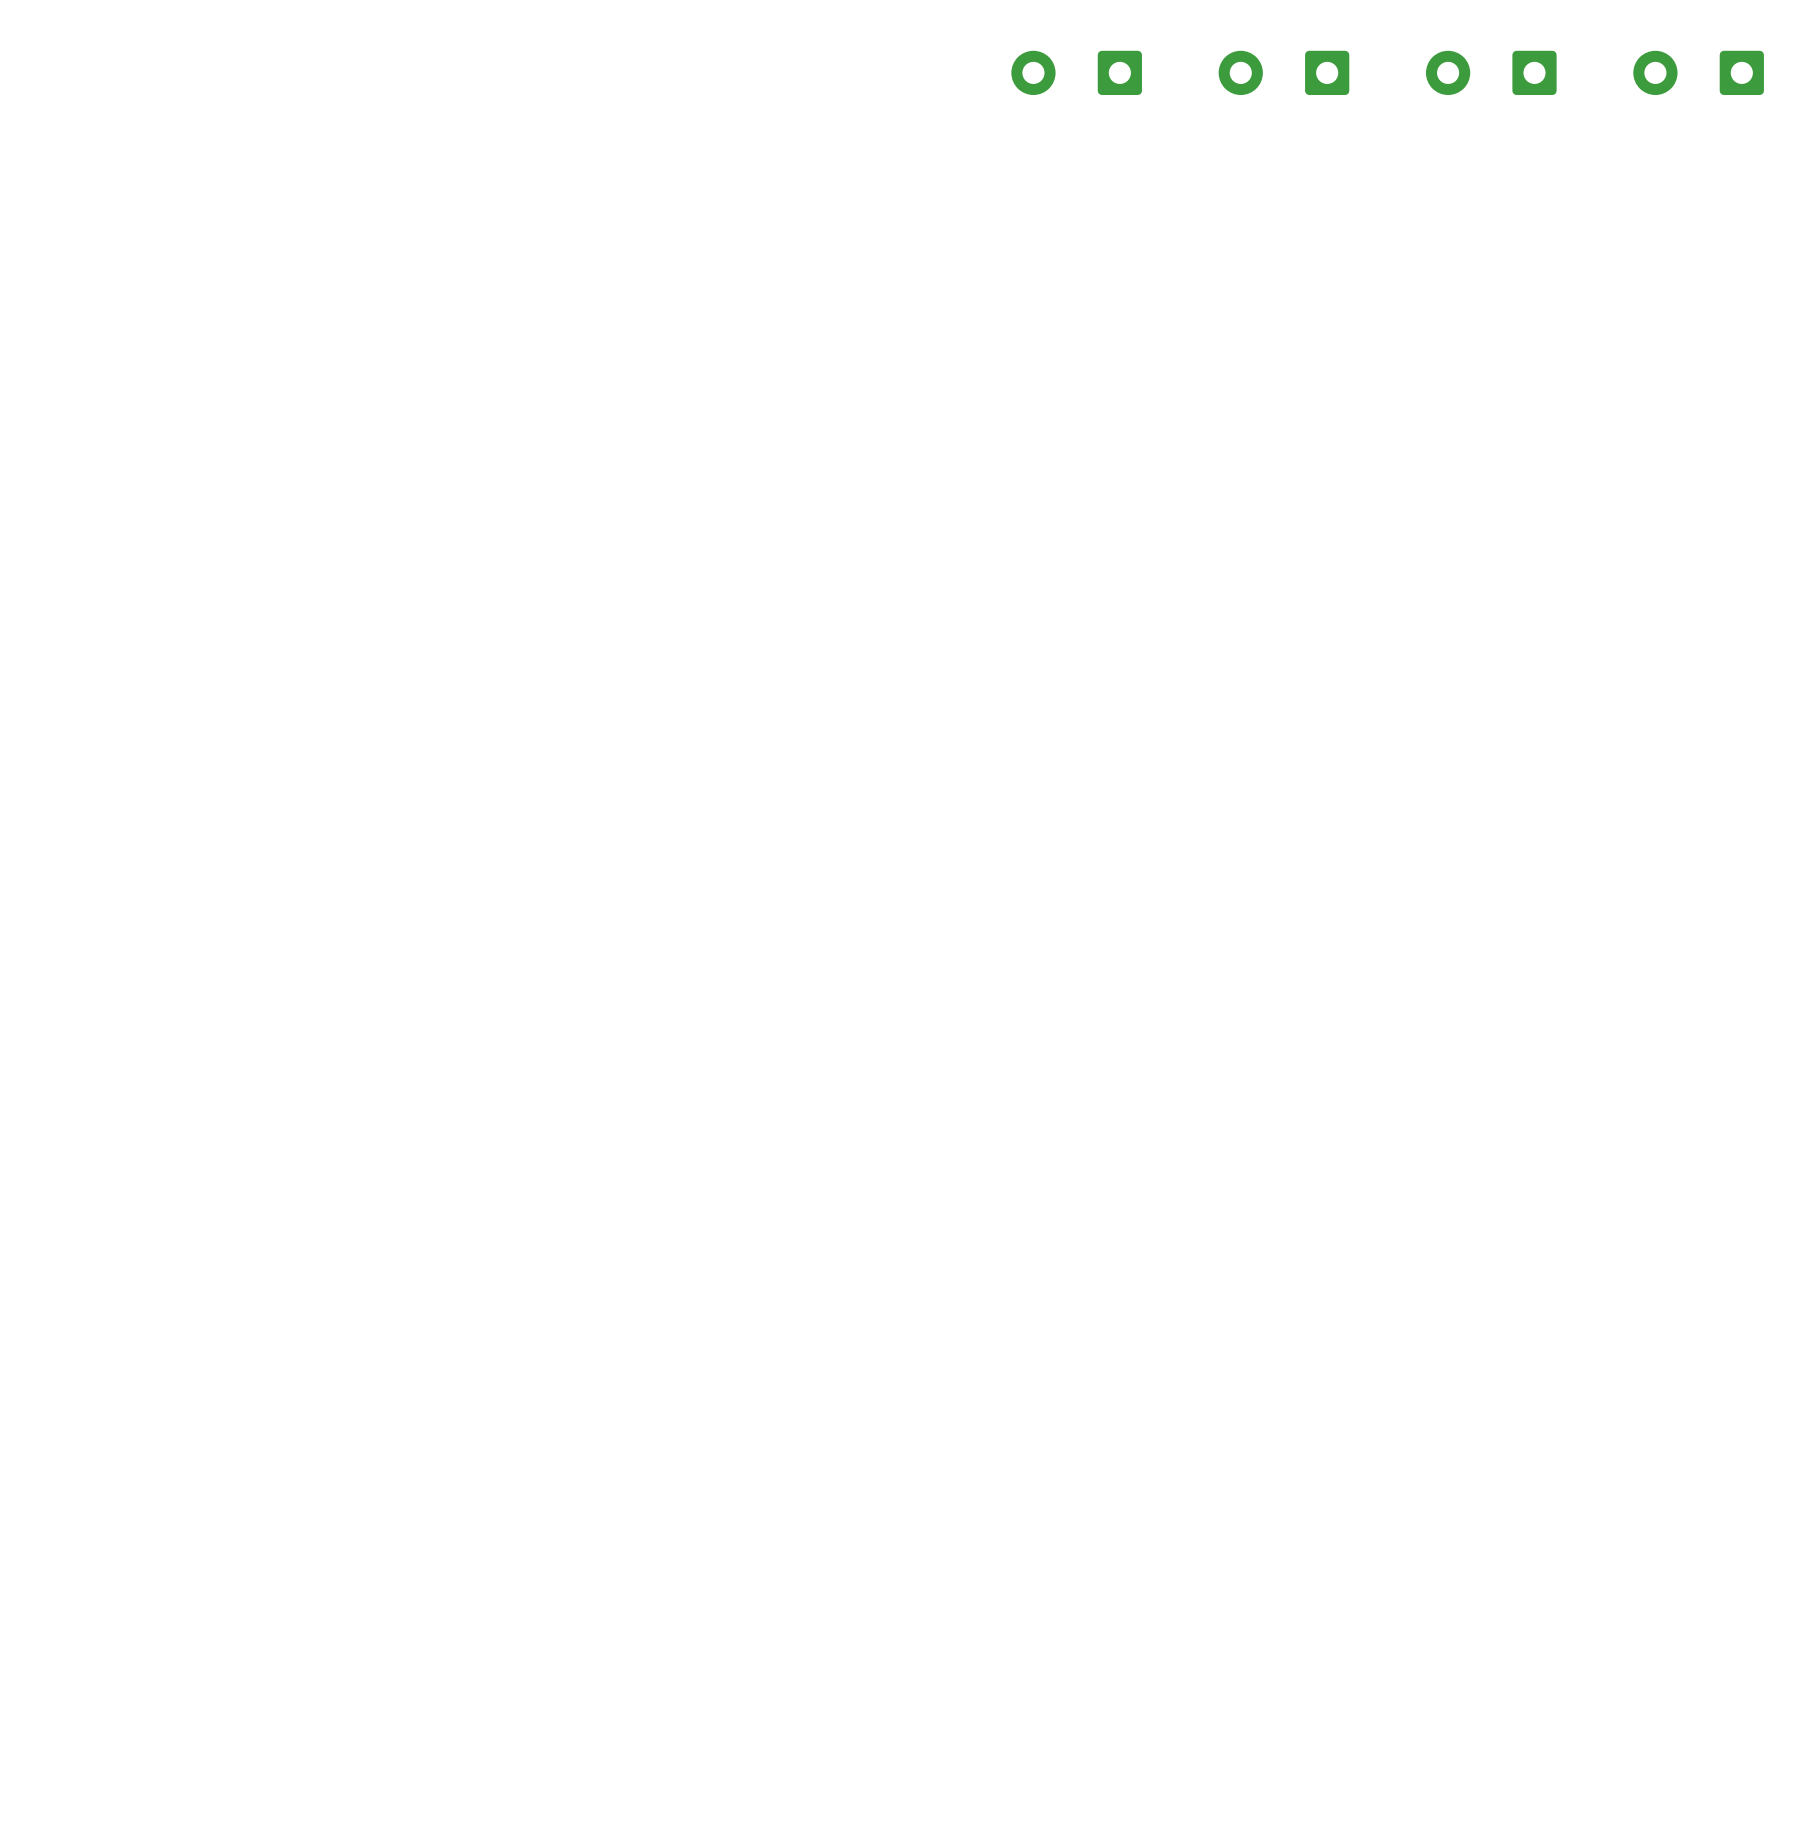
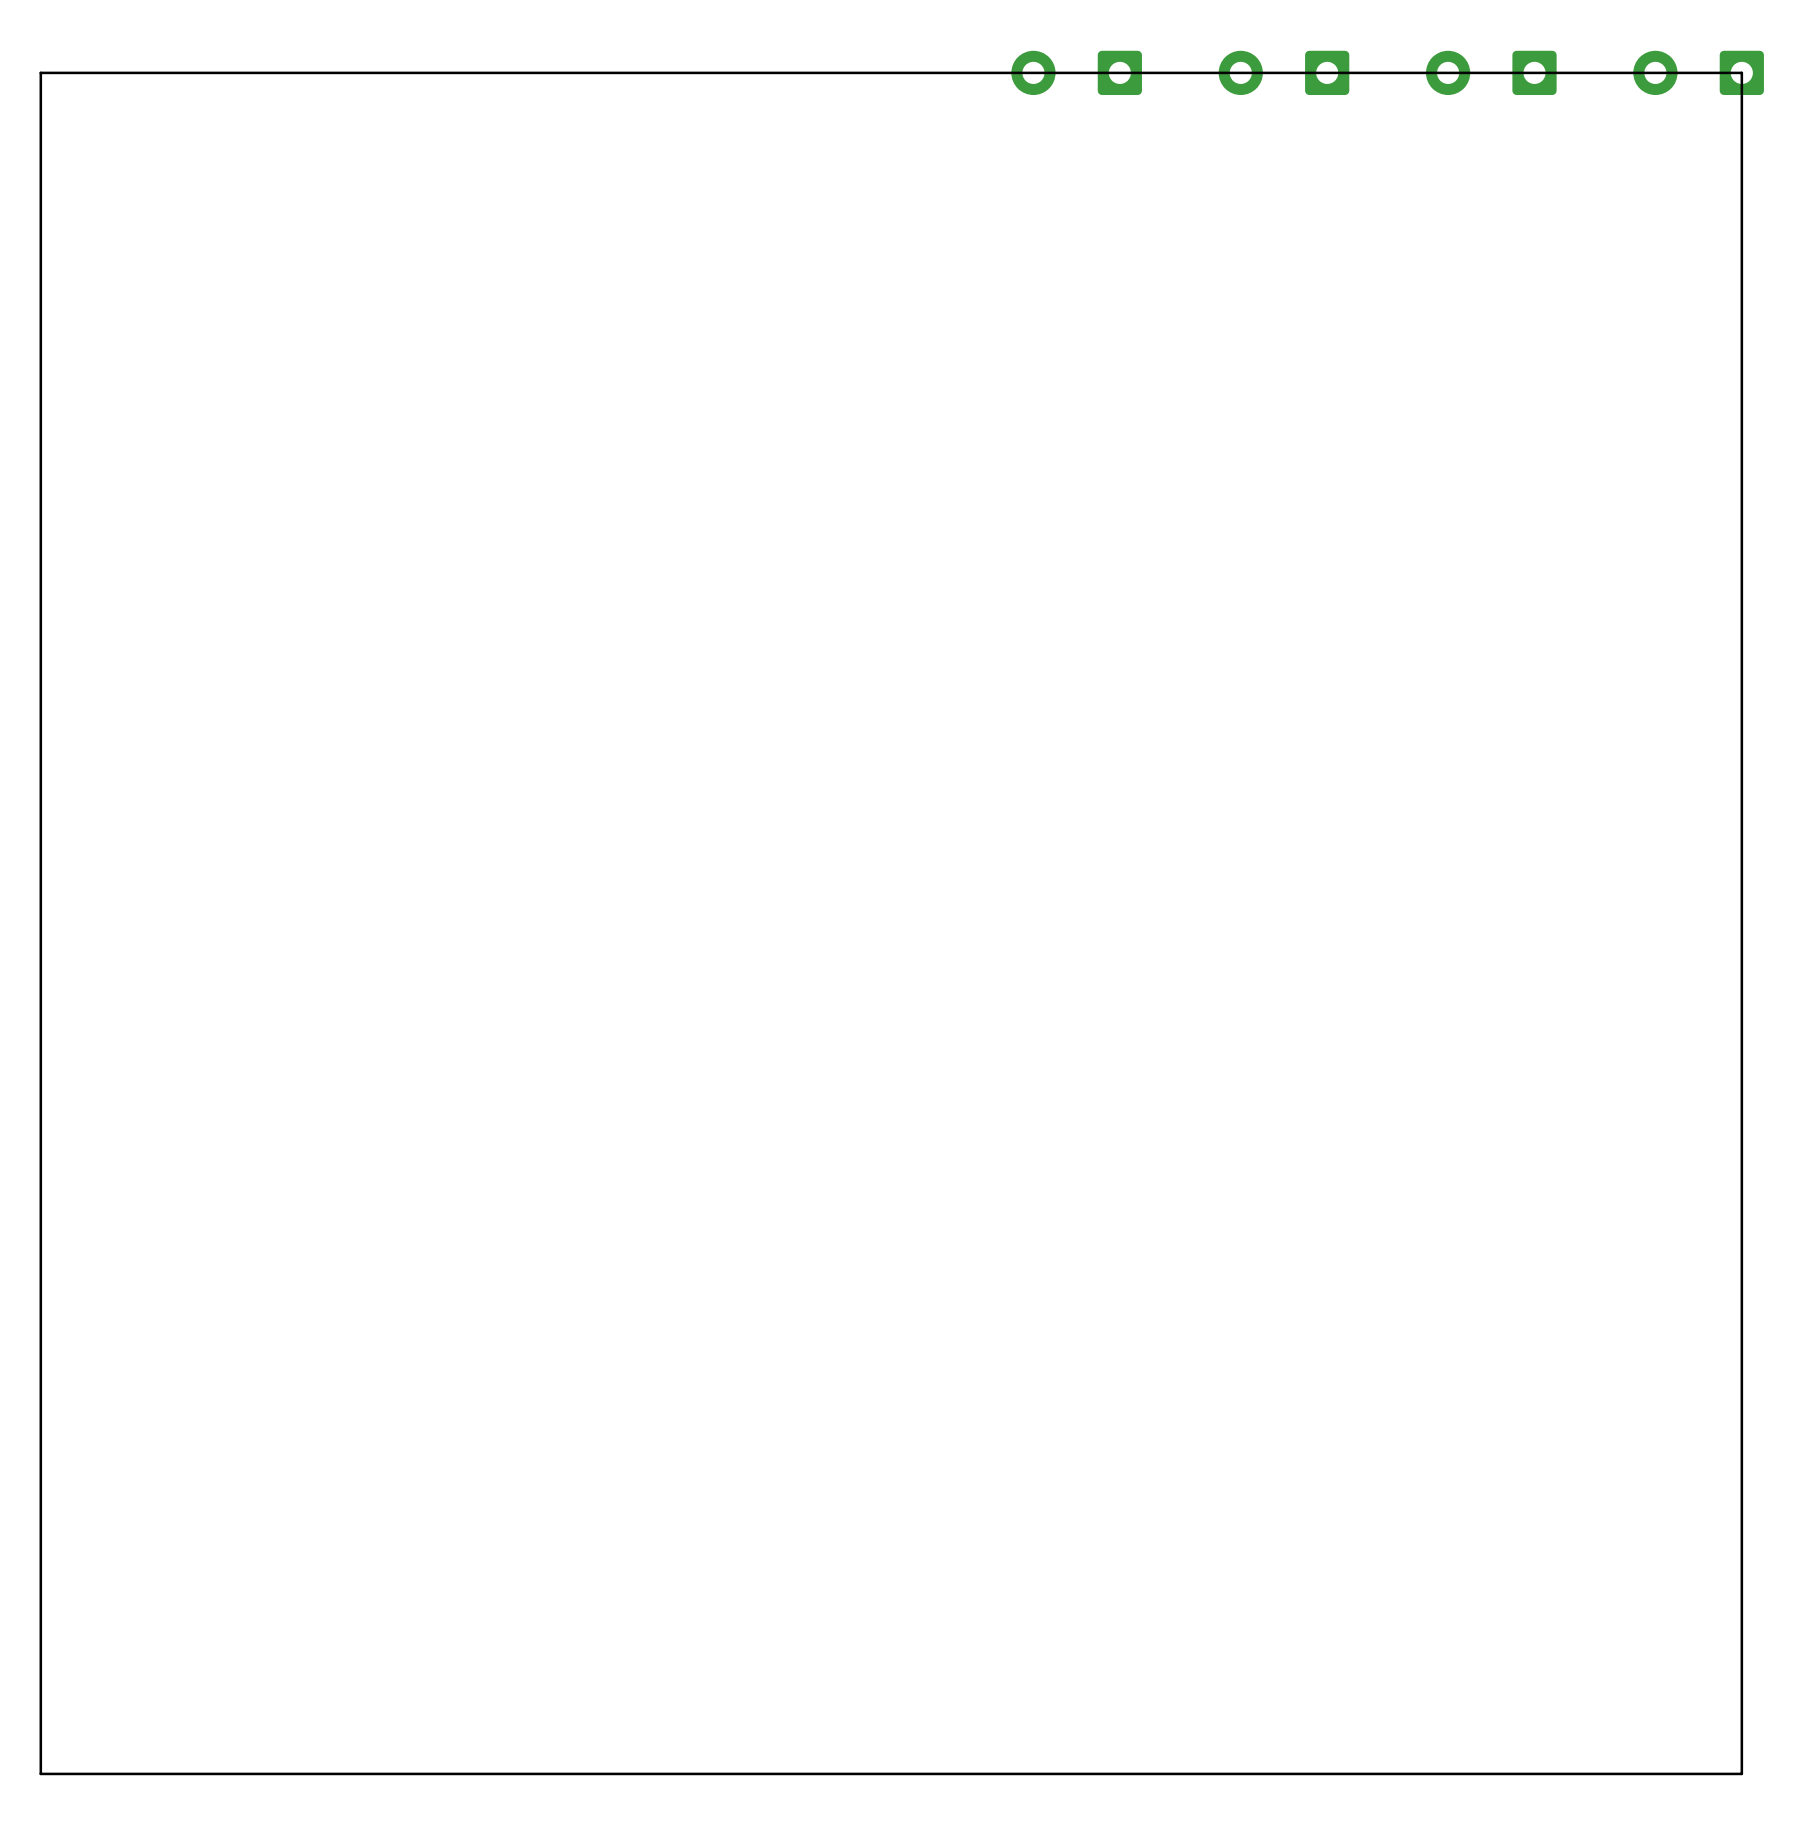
board edge: none -> (1741, 72) (40, 72) (40, 1773) (1741, 1773) (1741, 72)

